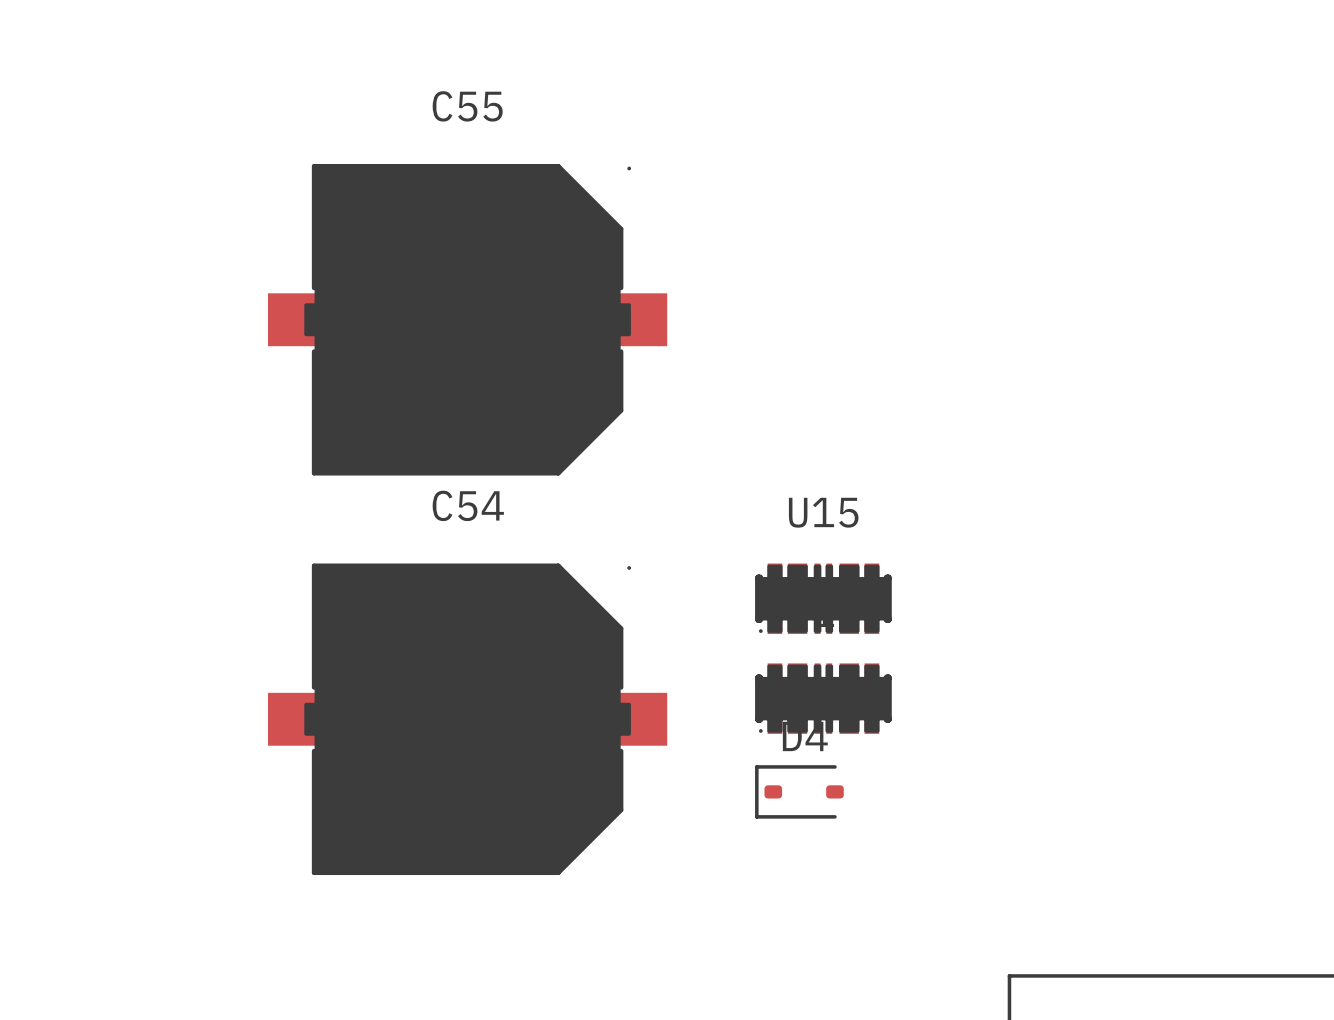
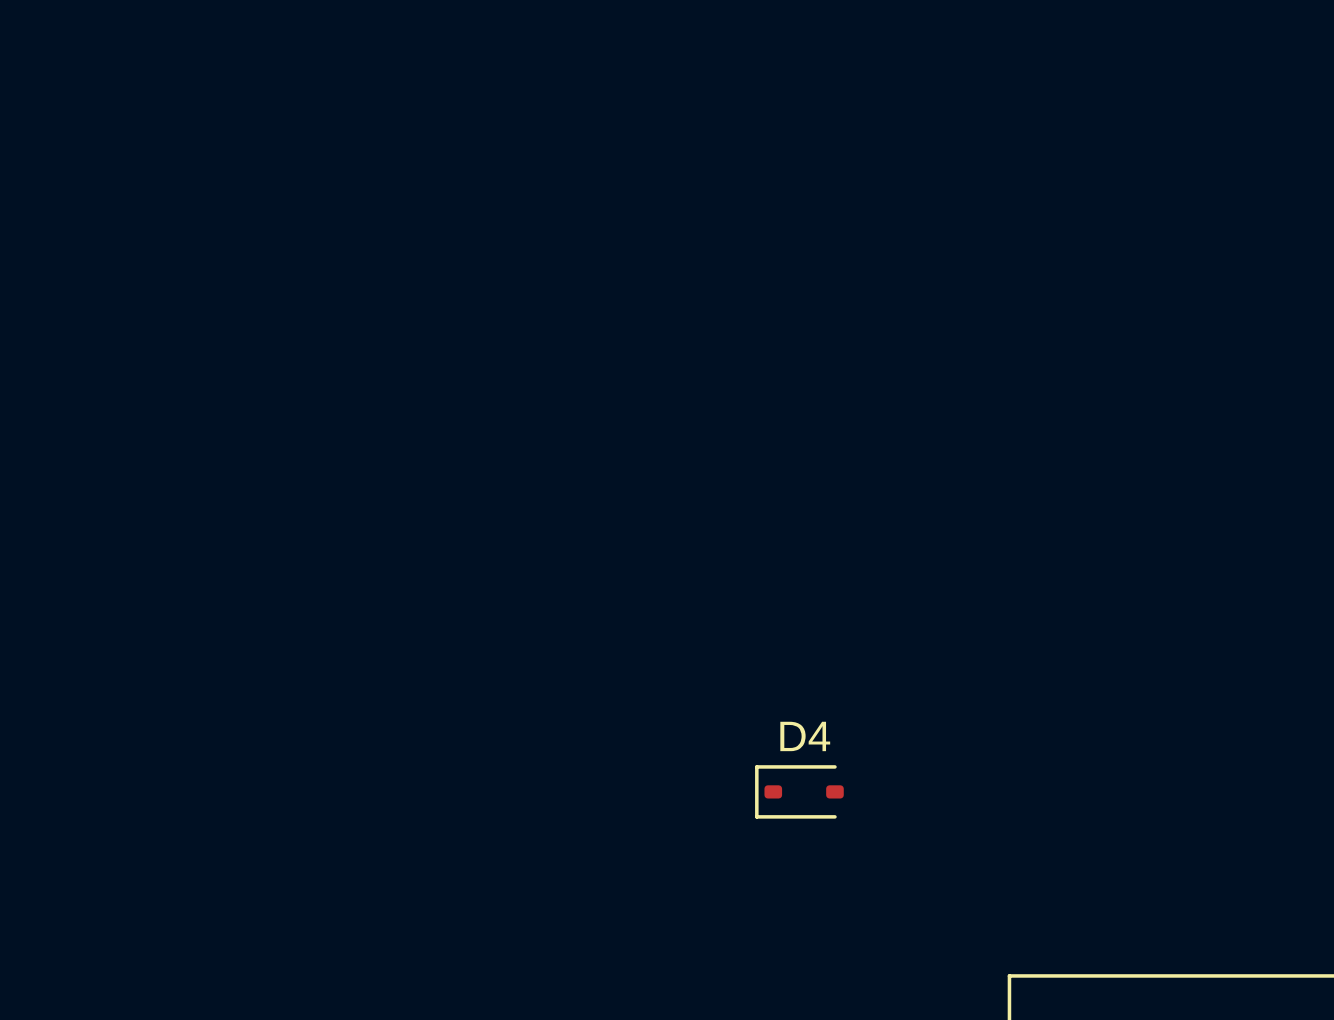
C55: (467, 319) -> none
U15: (823, 598) -> none
part: (823, 698) -> none
C54: (467, 719) -> none

